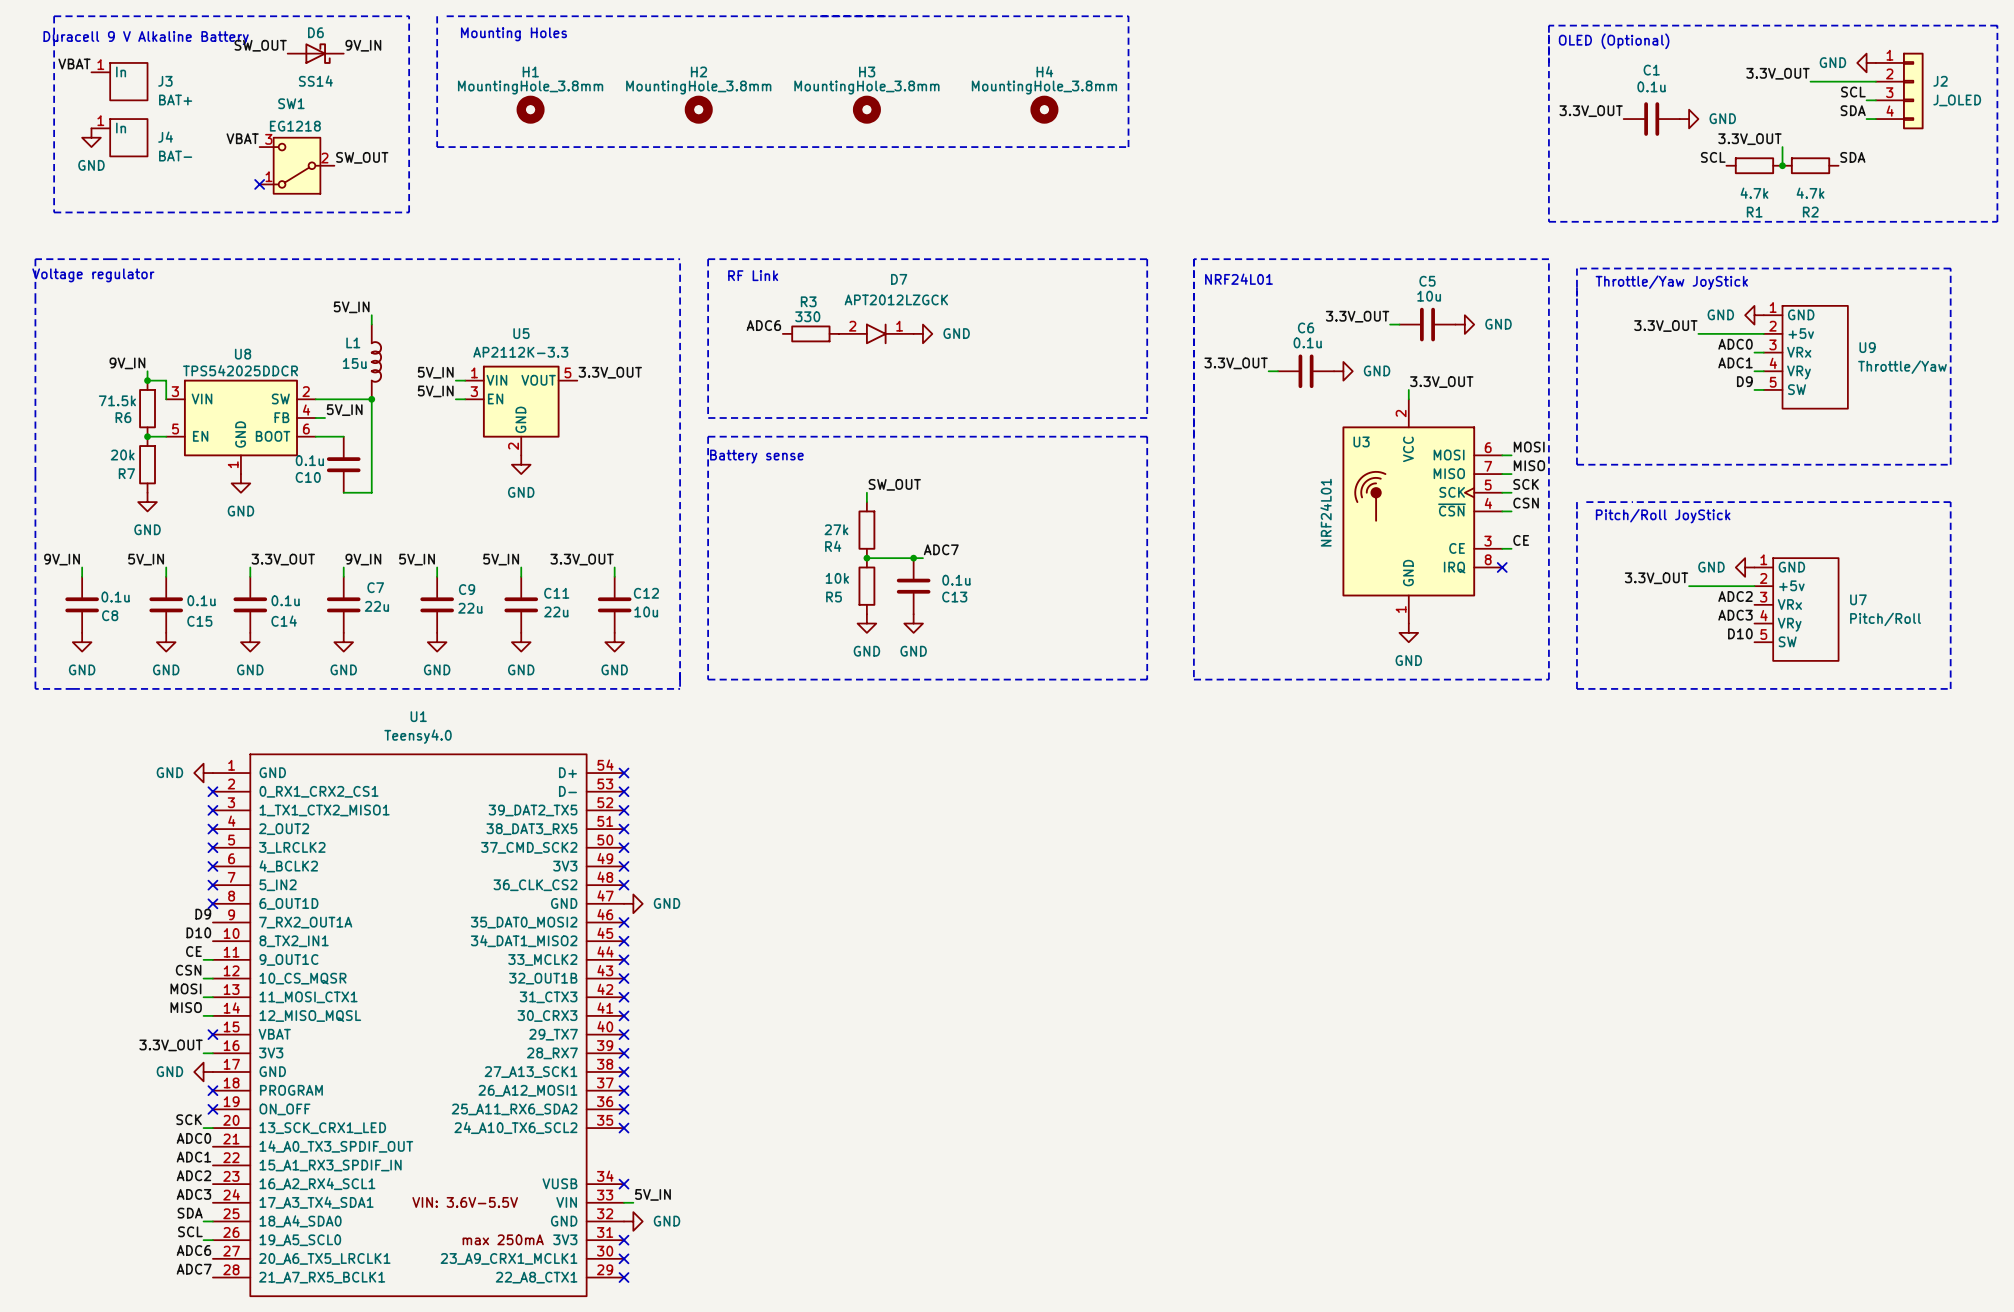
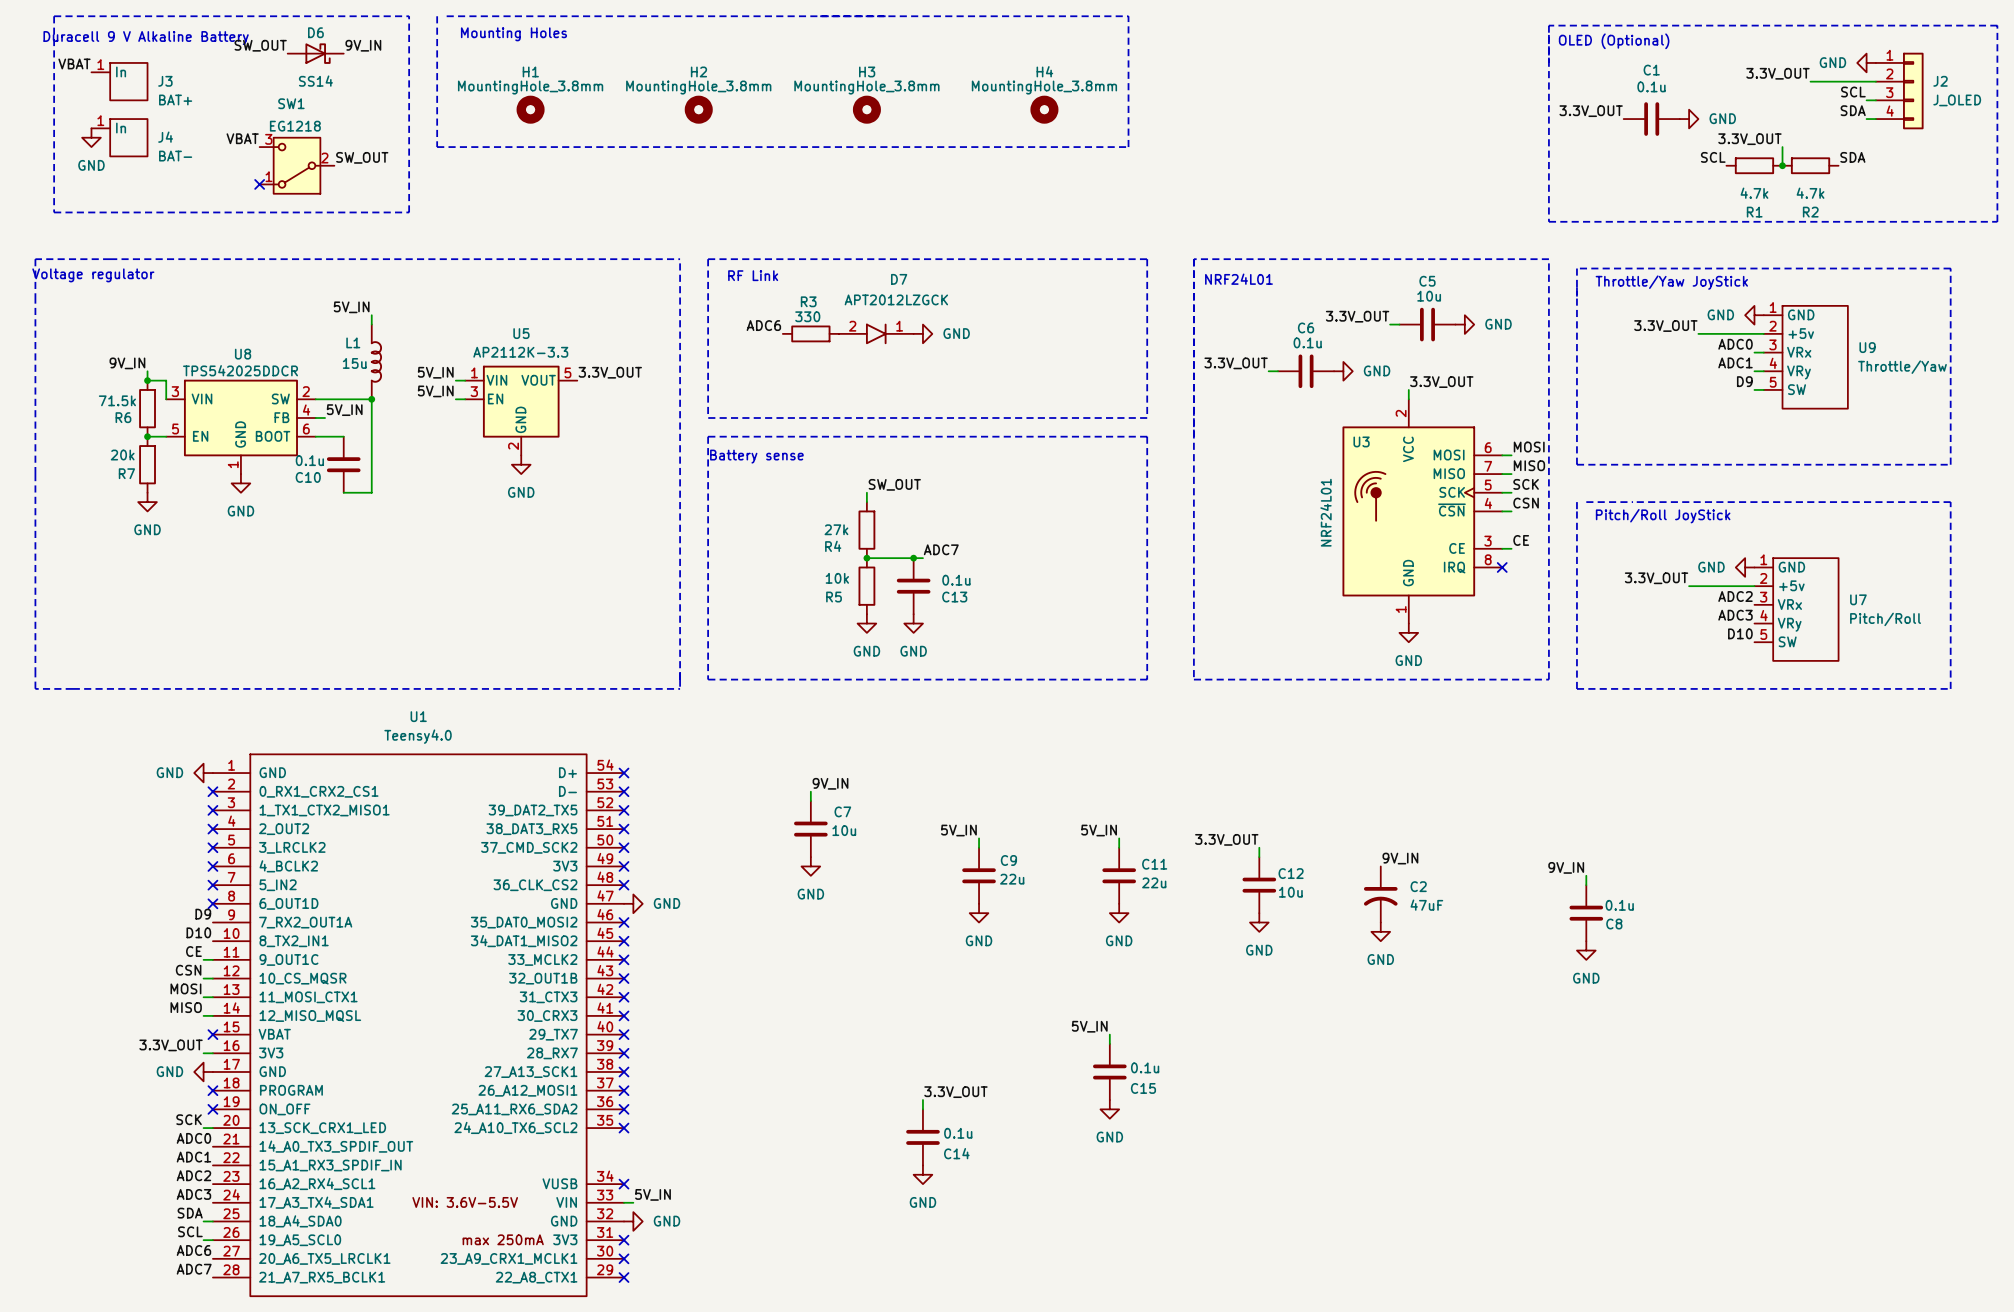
label: 9V_IN (62, 559) -> none
label: 5V_IN (146, 559) -> none
label: 3.3V_OUT (283, 559) -> none
label: 9V_IN (363, 559) -> none
label: 5V_IN (417, 559) -> none
label: 5V_IN (501, 559) -> none
label: 3.3V_OUT (582, 559) -> none
wire: (82, 567) (82, 576) -> none
wire: (166, 567) (166, 576) -> none
wire: (250, 567) (250, 576) -> none
wire: (343, 567) (343, 576) -> none
wire: (437, 567) (437, 576) -> none
wire: (521, 567) (521, 576) -> none
wire: (614, 567) (614, 576) -> none
C8 position: (82, 604) -> (1586, 913)
C15 position: (166, 604) -> (1109, 1071)
C14 position: (250, 604) -> (922, 1137)
C7 position: (343, 604) -> (810, 829)
C9 position: (437, 604) -> (979, 875)
C11 position: (521, 604) -> (1119, 875)
C12 position: (614, 604) -> (1259, 885)
C7 value: 22u (376, 606) -> 10u (844, 830)
power symbol: GND (82, 642) -> none
power symbol: GND (166, 642) -> none
power symbol: GND (250, 642) -> none
power symbol: GND (343, 642) -> none
power symbol: GND (437, 642) -> none
power symbol: GND (521, 642) -> none
power symbol: GND (614, 642) -> none
label: none -> 9V_IN (830, 783)
wire: none -> (810, 791) (810, 801)
label: none -> 5V_IN (958, 830)
label: none -> 5V_IN (1099, 830)
wire: none -> (979, 838) (979, 847)
wire: none -> (1119, 838) (1119, 847)
label: none -> 3.3V_OUT (1226, 839)
wire: none -> (1259, 847) (1259, 857)
label: none -> 9V_IN (1400, 858)
power symbol: none -> GND (810, 866)
label: none -> 9V_IN (1566, 867)
wire: none -> (1586, 875) (1586, 885)
C2: none -> 47uF (1380, 894)
power symbol: none -> GND (979, 913)
power symbol: none -> GND (1119, 913)
power symbol: none -> GND (1259, 922)
power symbol: none -> GND (1380, 931)
power symbol: none -> GND (1586, 950)
label: none -> 5V_IN (1089, 1026)
wire: none -> (1109, 1034) (1109, 1043)
label: none -> 3.3V_OUT (955, 1092)
wire: none -> (922, 1100) (922, 1109)
power symbol: none -> GND (1109, 1109)
power symbol: none -> GND (922, 1174)

